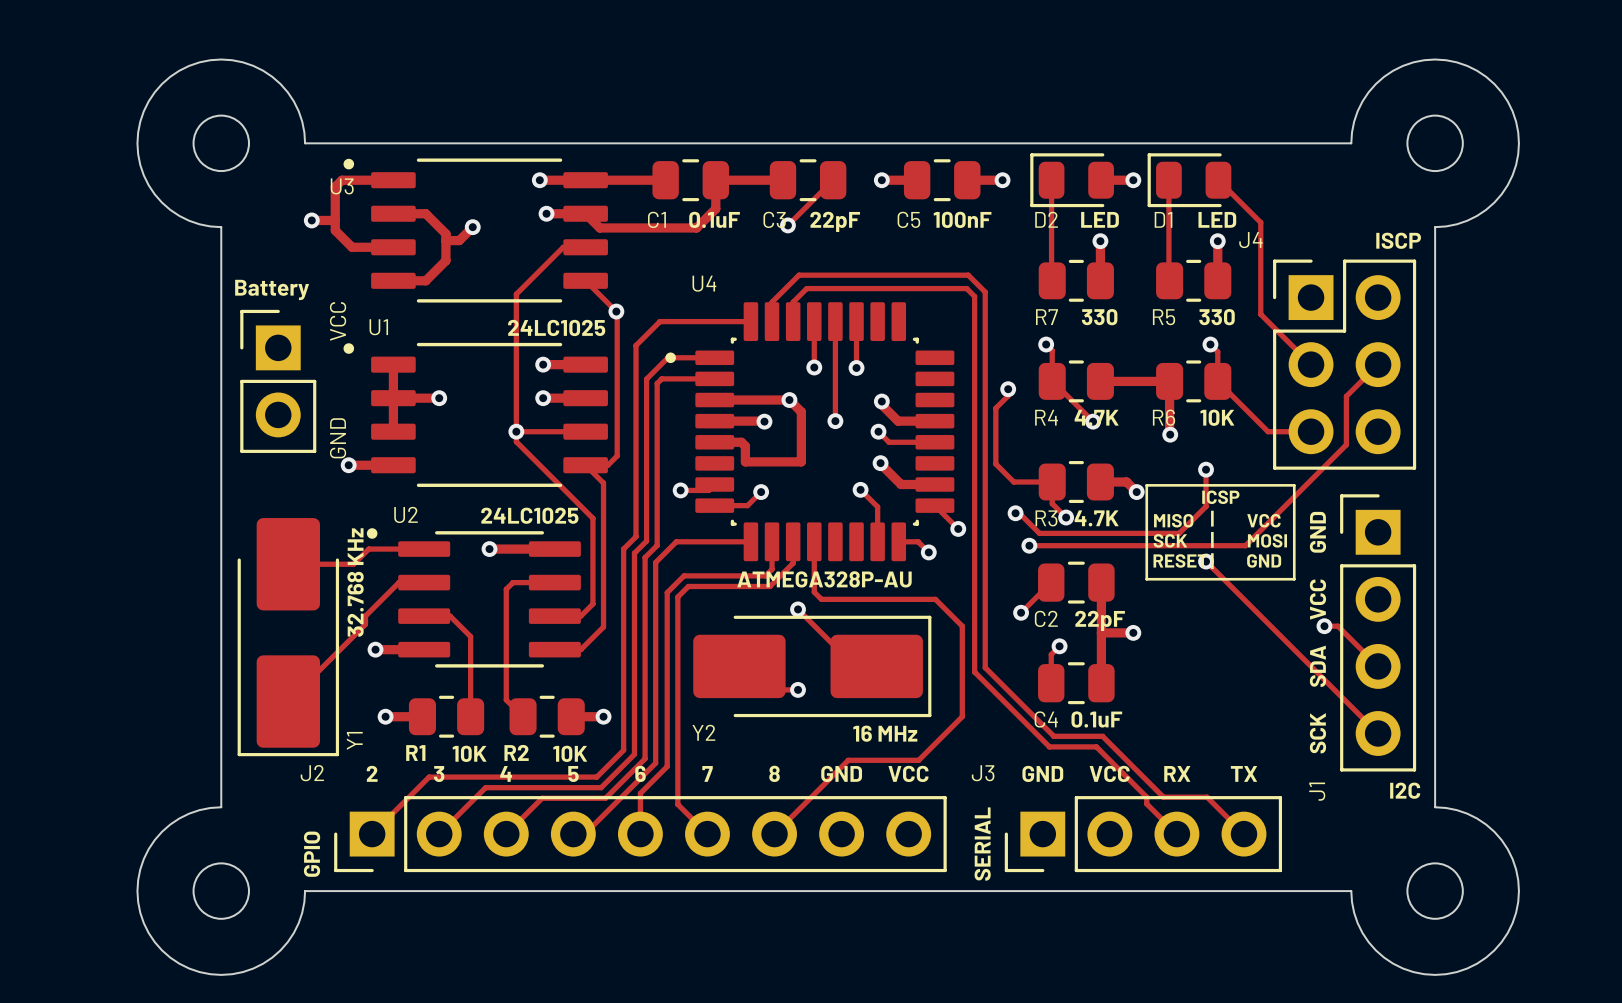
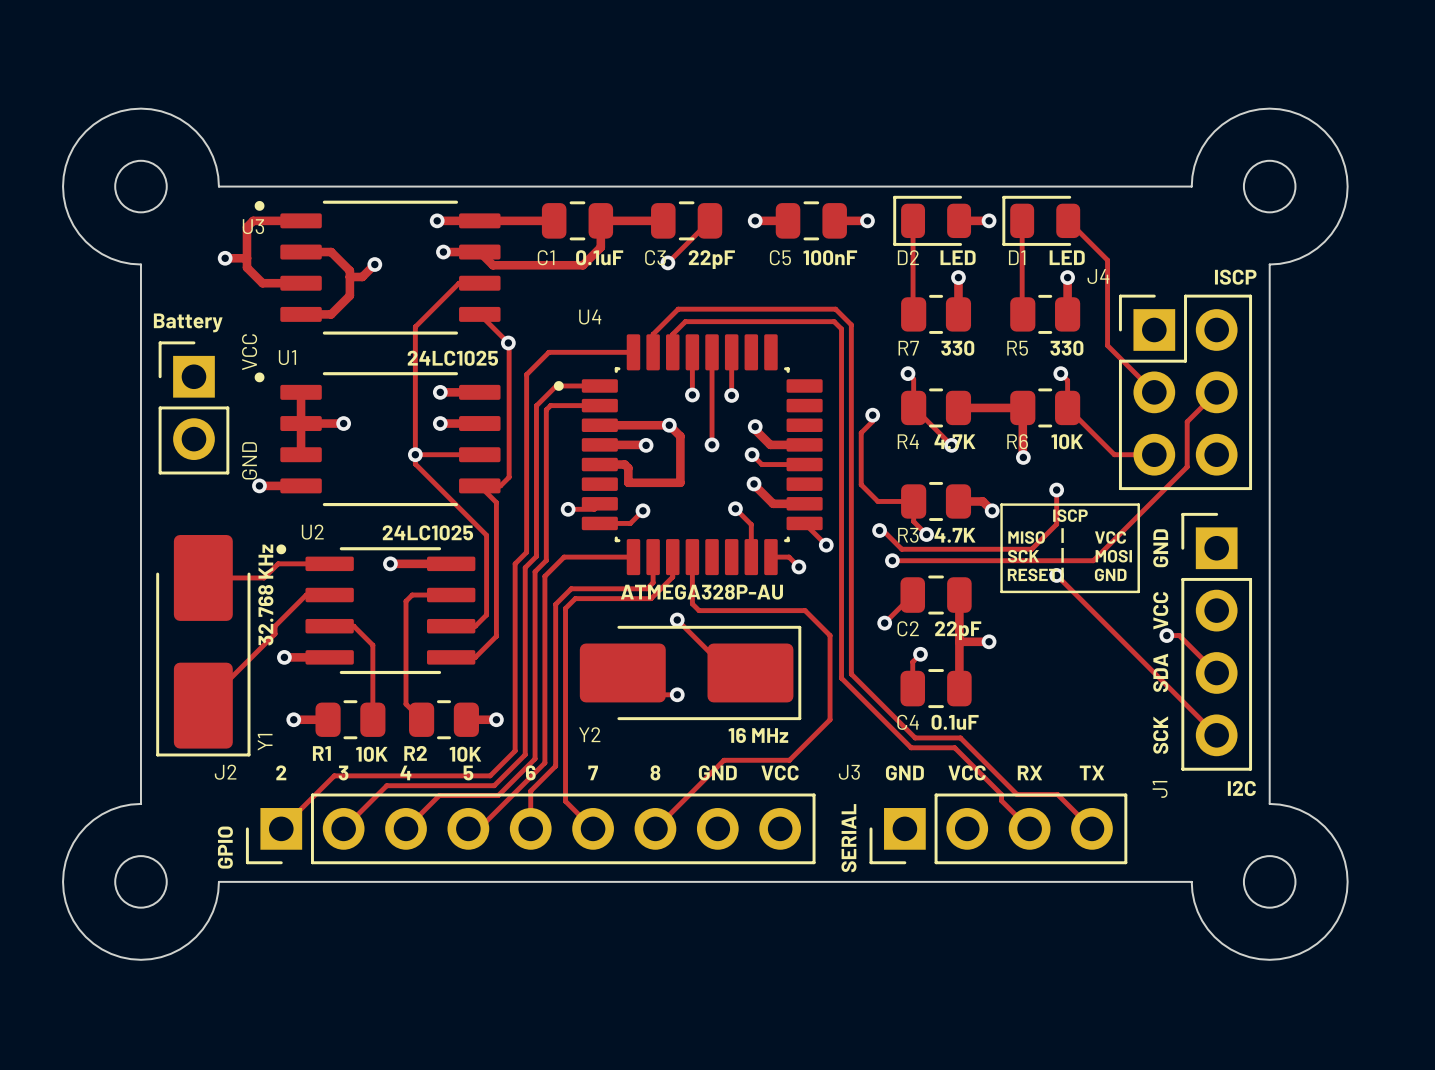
text: ICSP (1220, 497) -> ISCP (1070, 515)

